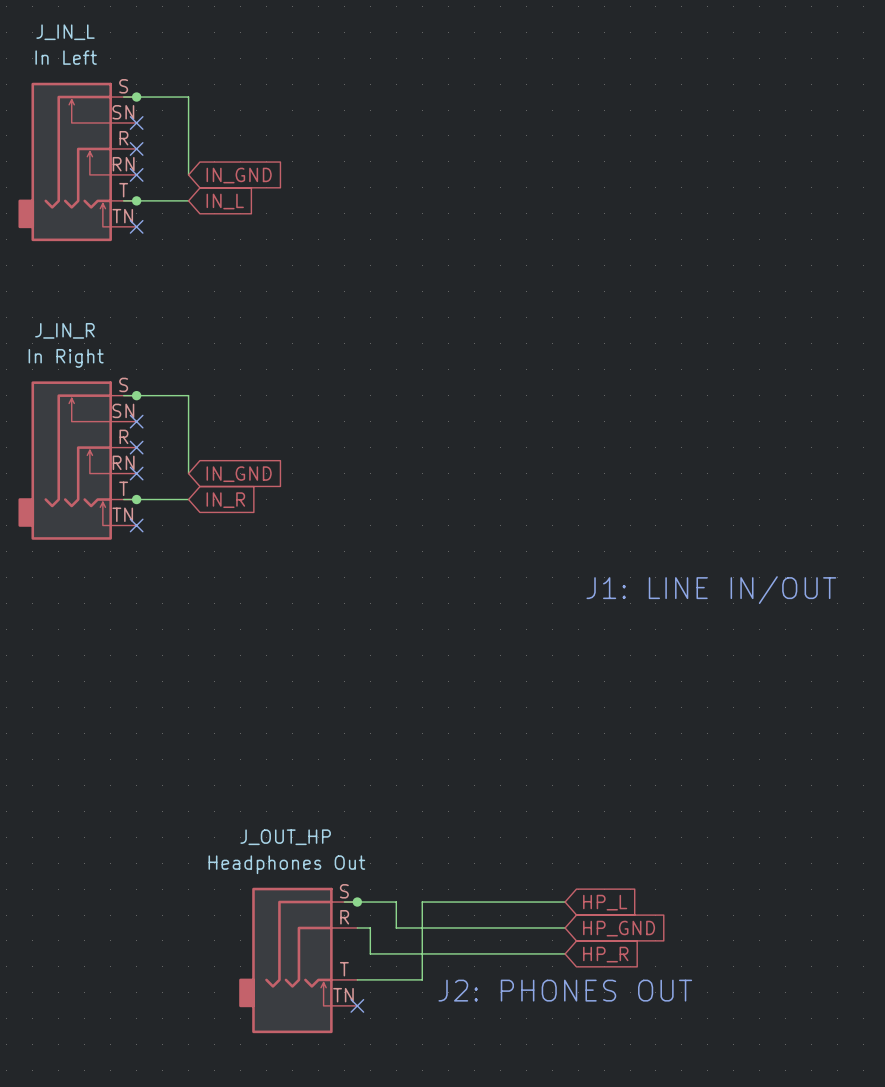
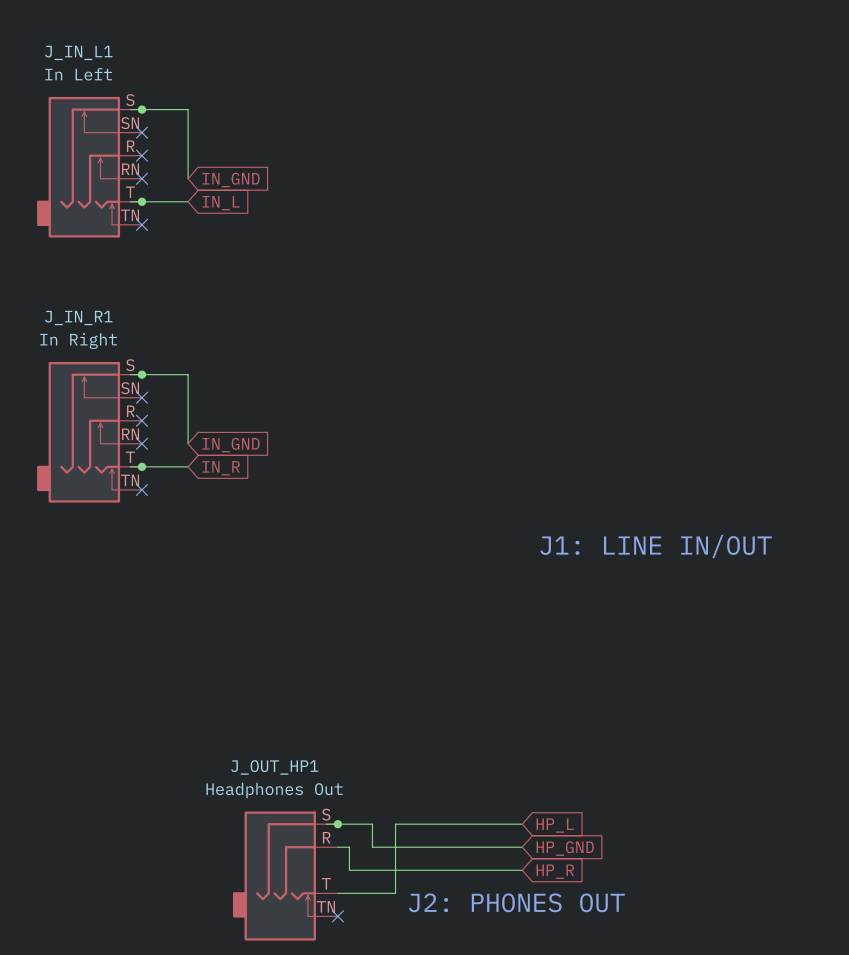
J_IN_L name: J_IN_L (65, 32) -> J_IN_L1 (78, 52)
J_IN_R name: J_IN_R (64, 330) -> J_IN_R1 (78, 318)
J_OUT_HP name: J_OUT_HP (285, 837) -> J_OUT_HP1 (274, 767)

